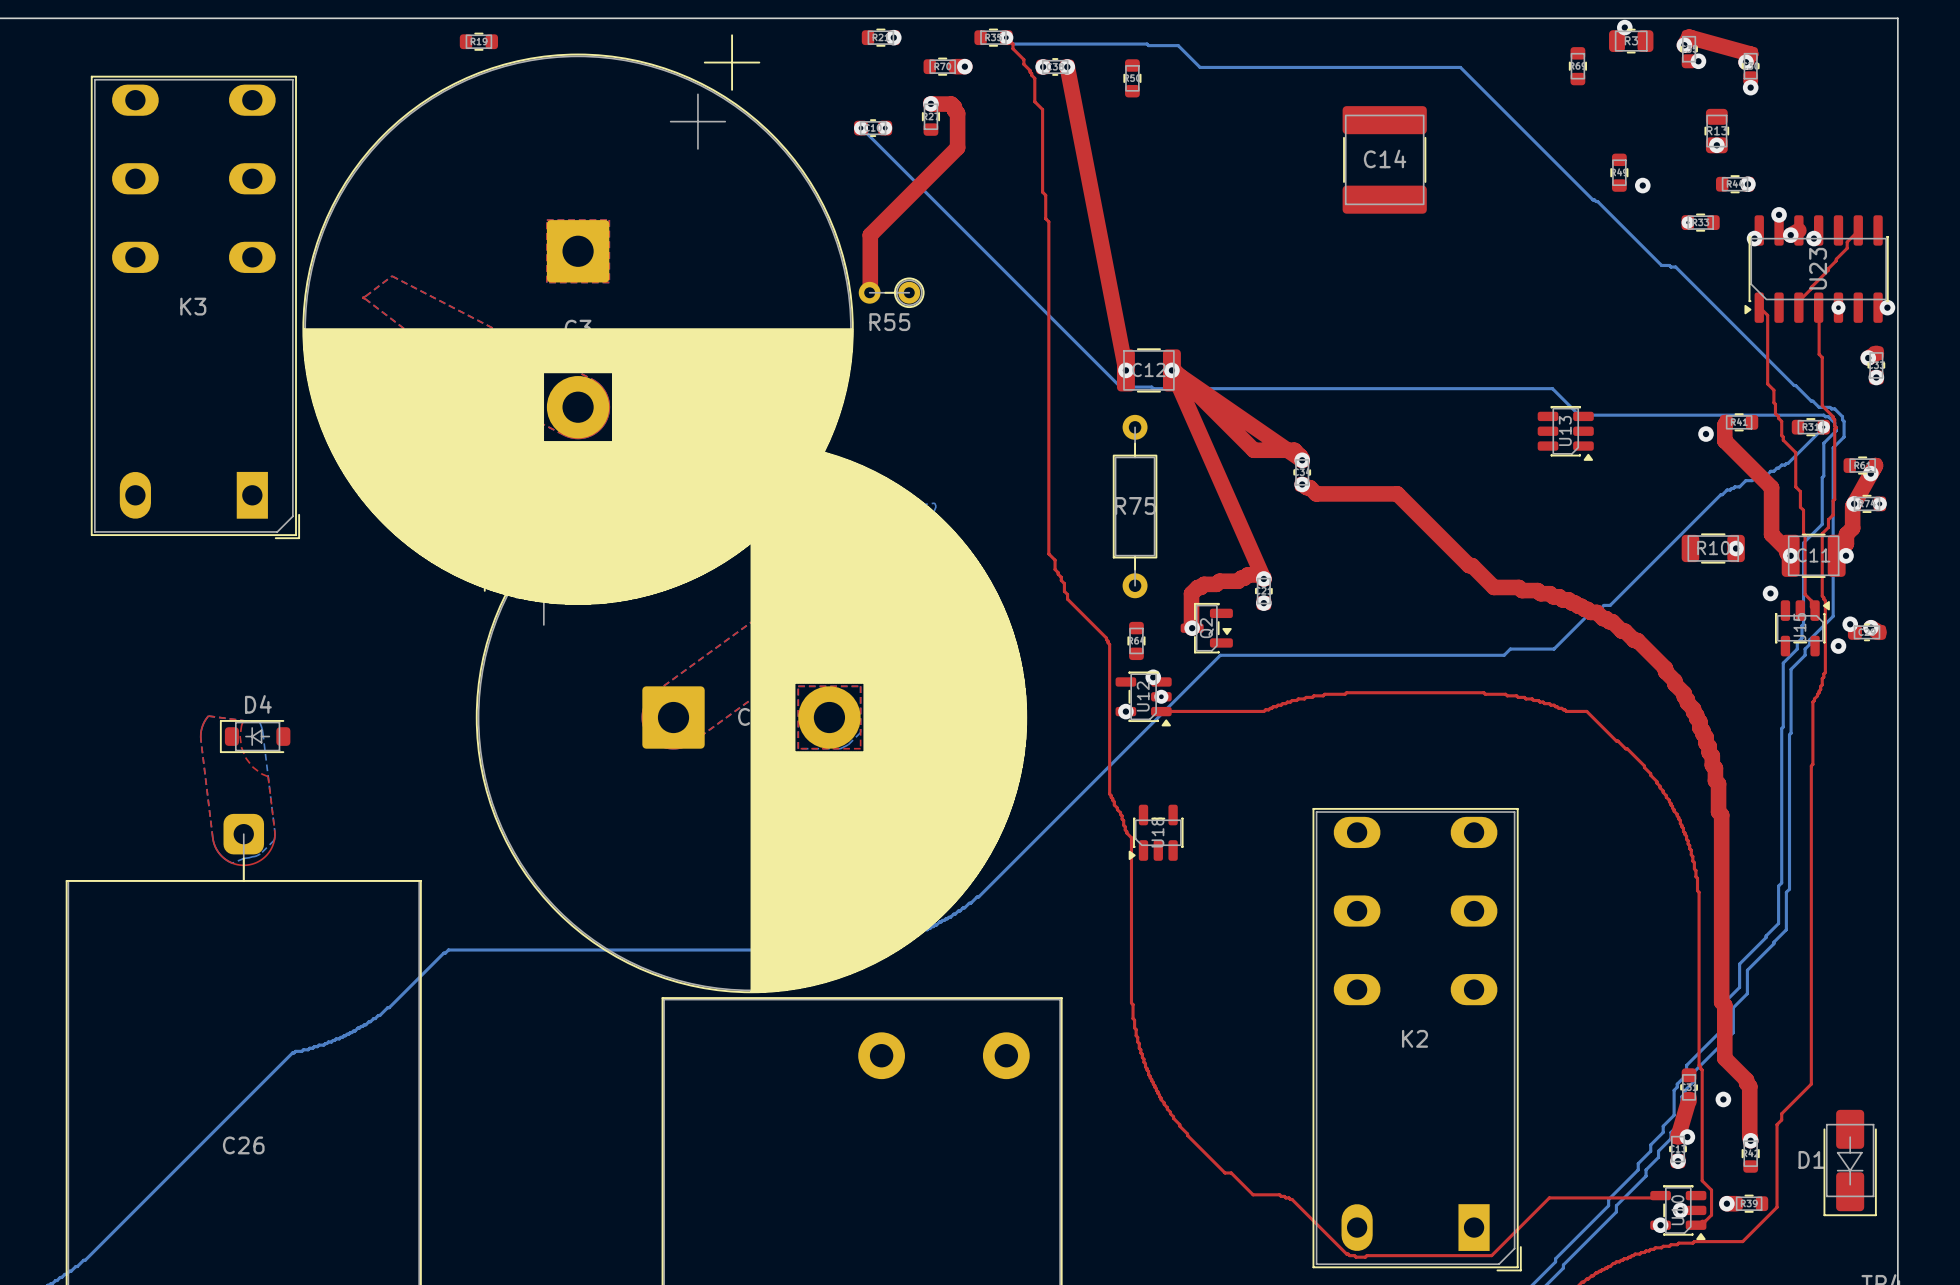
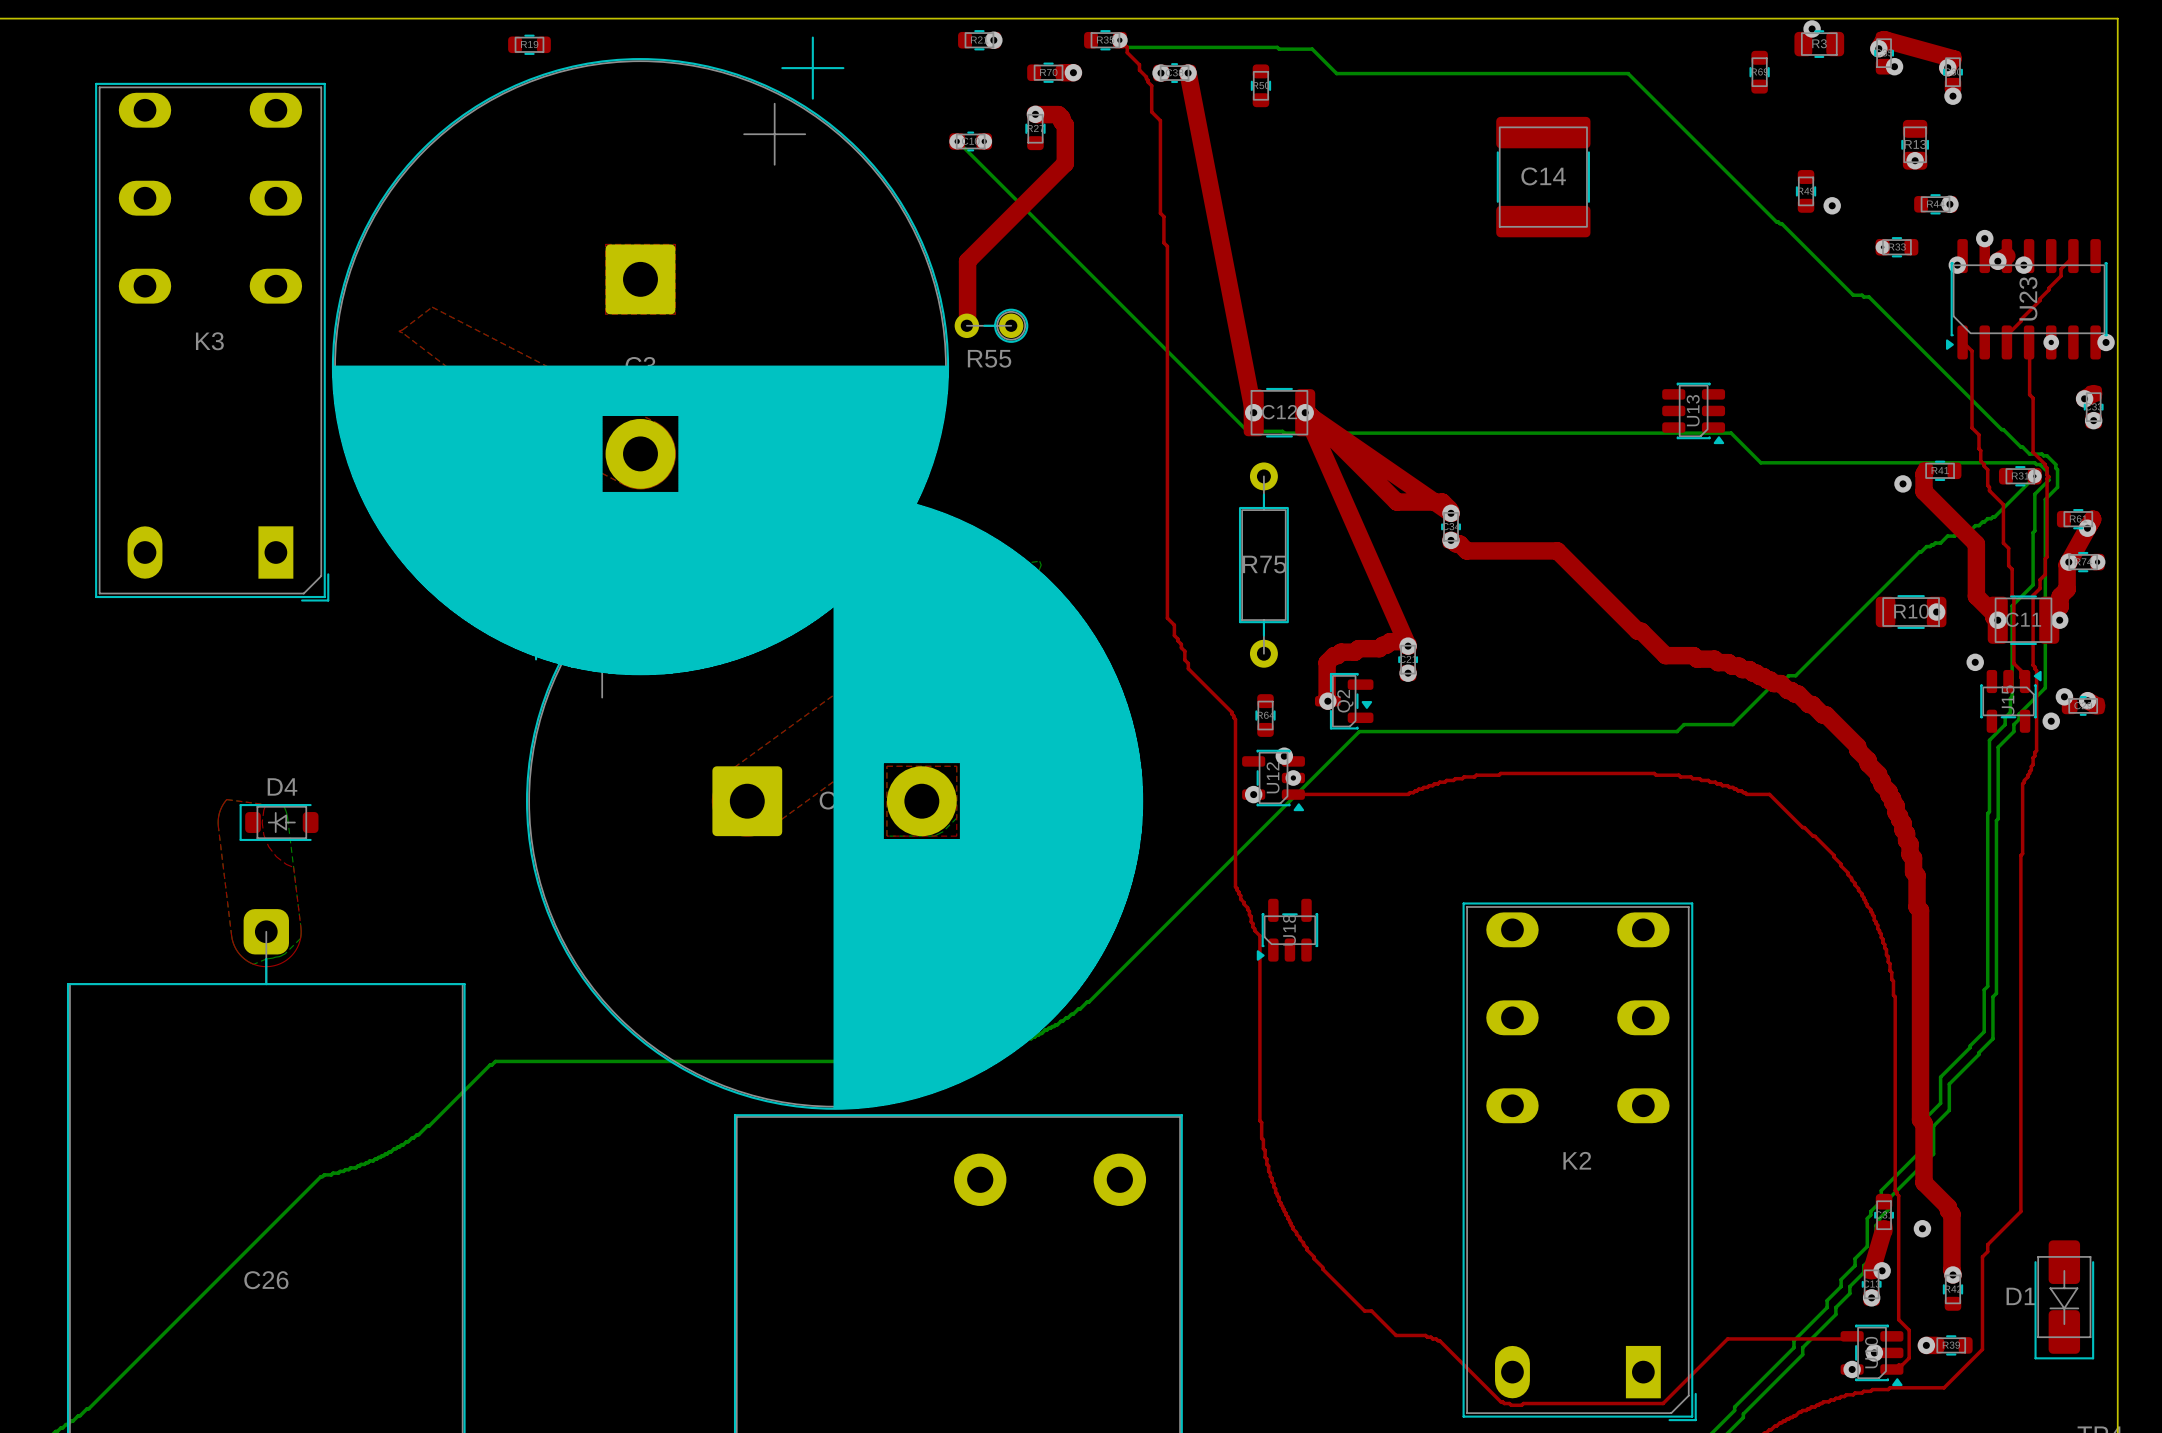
U13 position: (1565, 433) -> (1693, 413)

